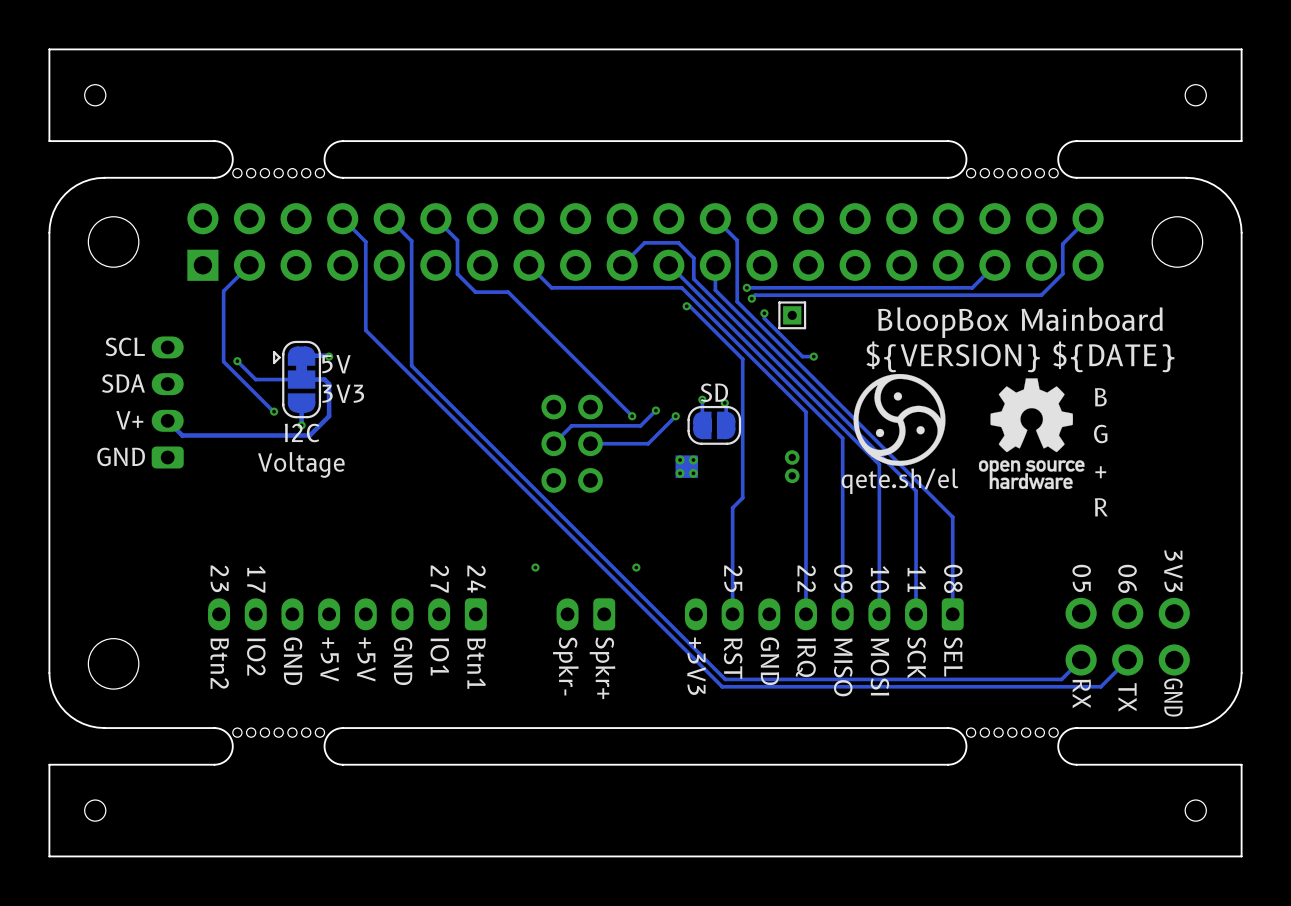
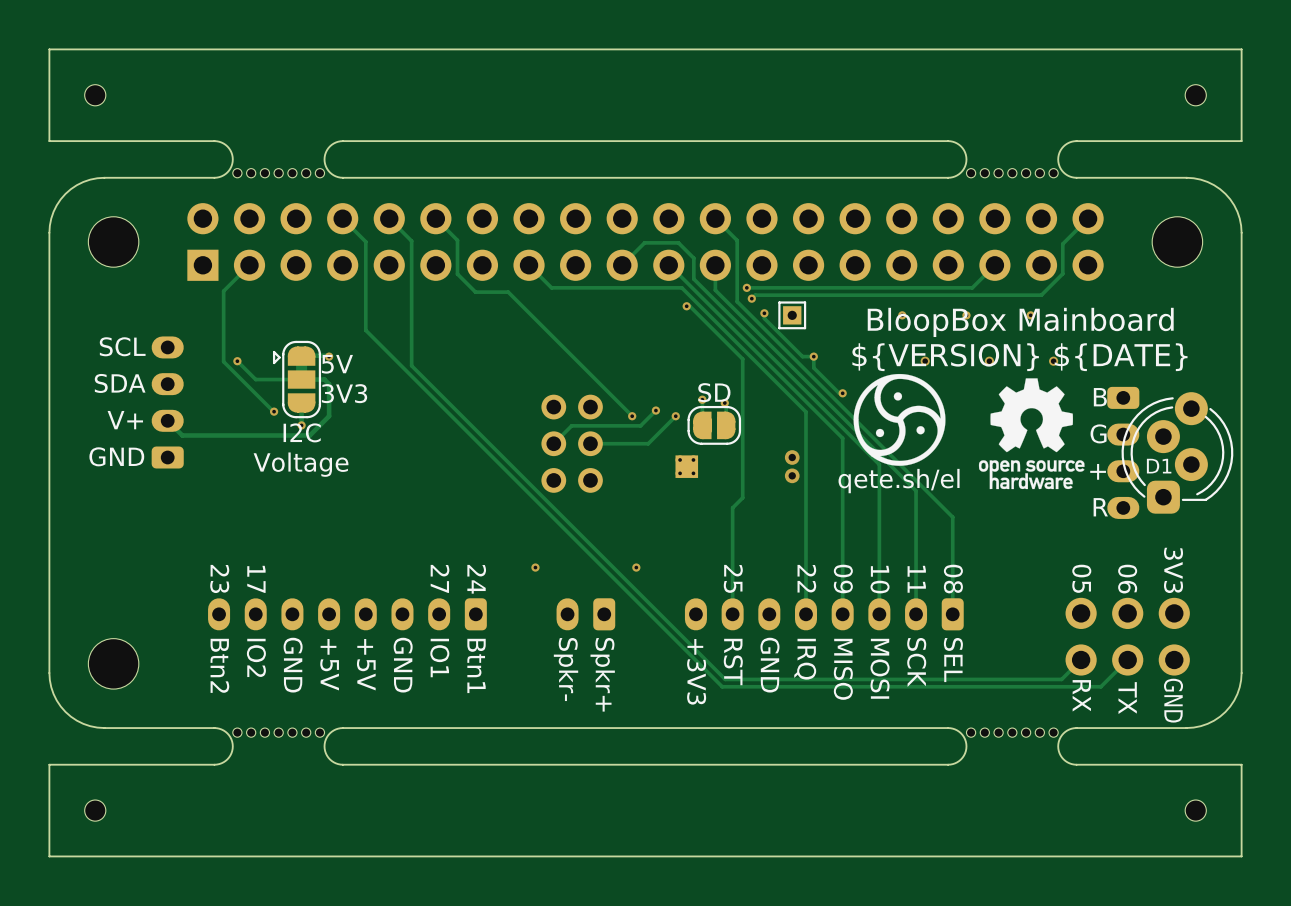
via: none -> (902, 315)
via: none -> (966, 315)
via: none -> (1030, 315)
track: none -> (813, 356) (813, 367) (839, 393) (842, 393)
via: none -> (925, 361)
via: none -> (989, 361)
via: none -> (1053, 361)
via: none -> (842, 393)
part: none -> (1123, 452)
D1: none -> (1177, 452)

